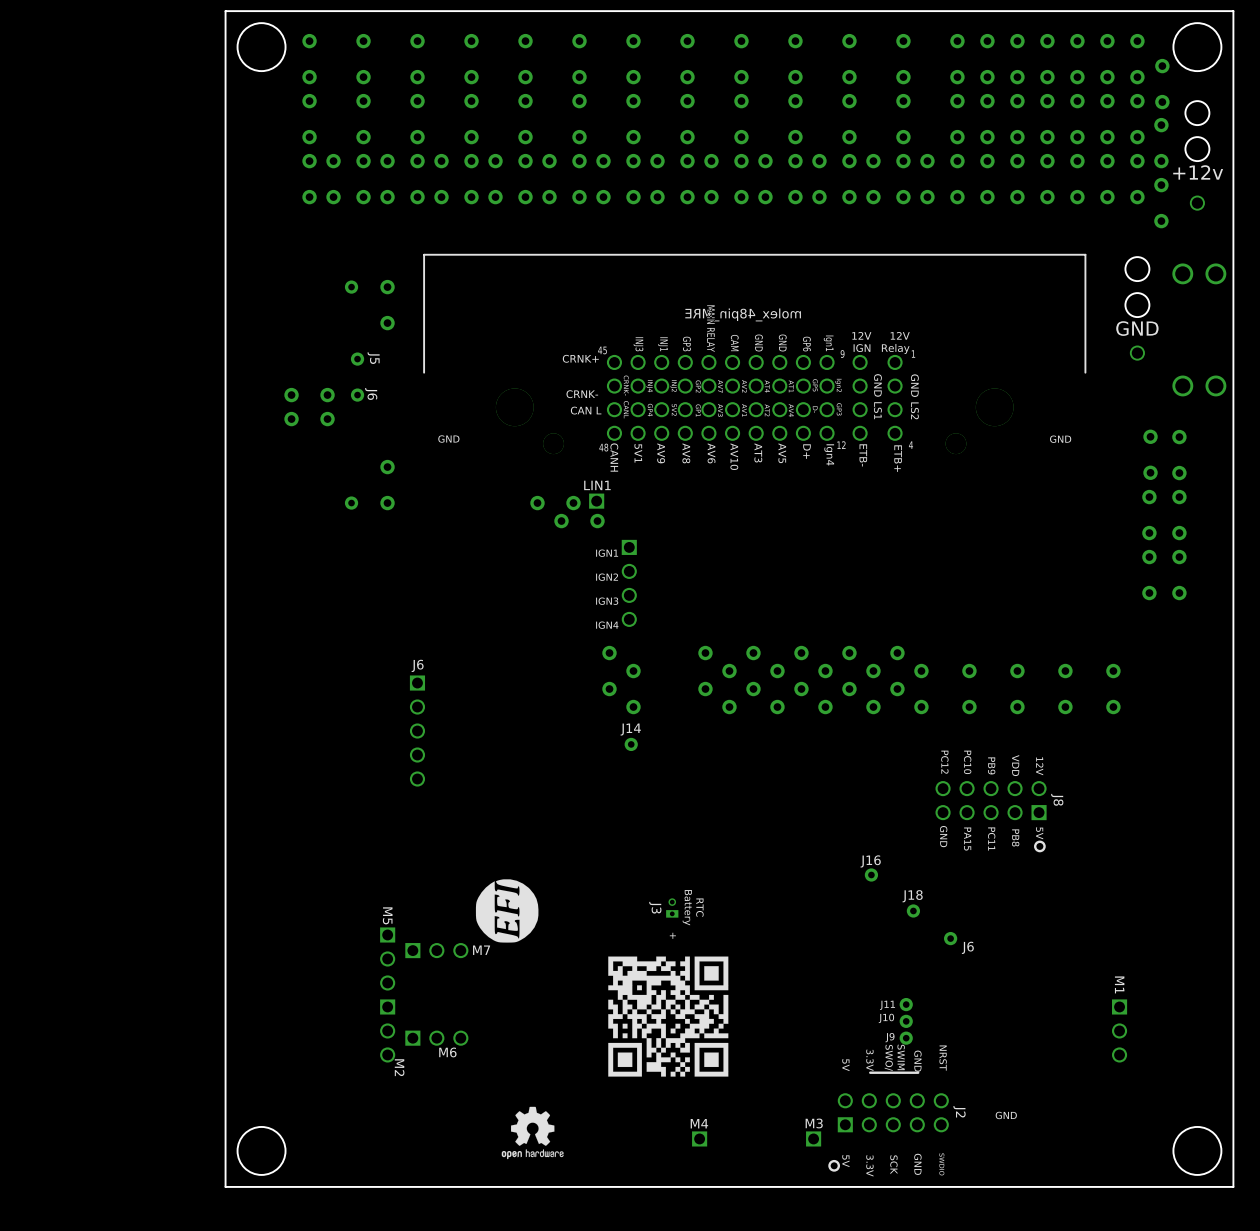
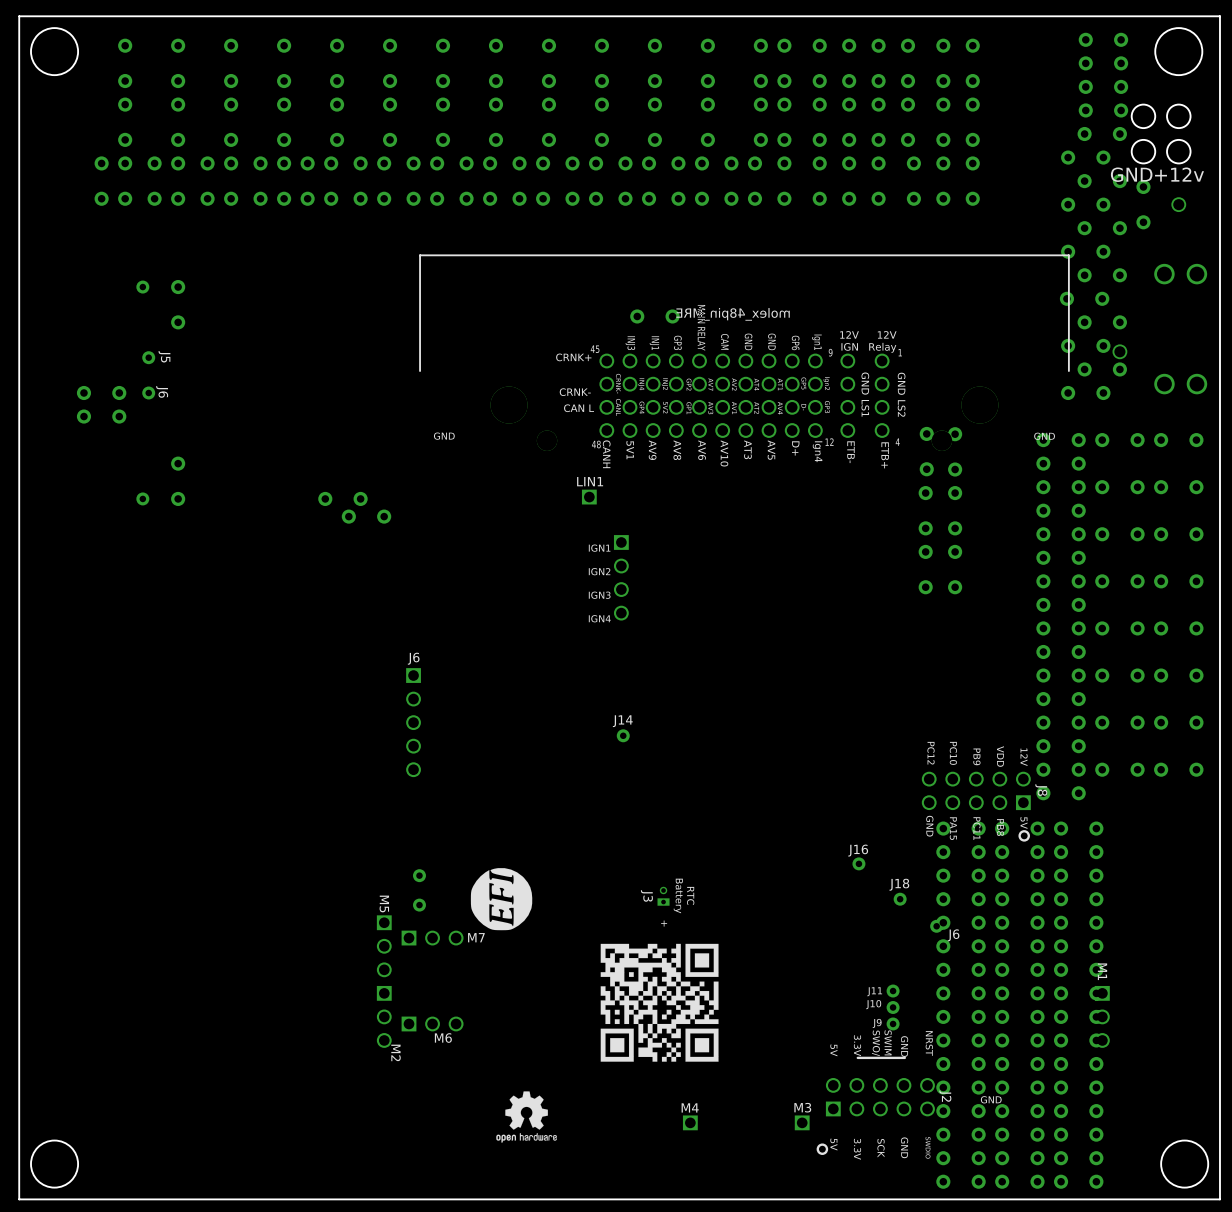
board edge: (1233, 11) (1233, 1186) (225, 1186) (225, 11) -> (1214, 16) (1219, 16) (1219, 1199) (19, 1199) (19, 16) (225, 16)
part: none -> (1103, 39)
round board edge position: (261, 47) -> (54, 51)
part: none -> (125, 63)
part: none -> (178, 63)
part: none -> (231, 63)
part: none -> (284, 63)
part: (309, 59) -> none
part: none -> (337, 63)
part: (363, 59) -> none
part: none -> (390, 63)
part: (417, 59) -> none
part: none -> (443, 63)
part: (471, 59) -> none
part: none -> (496, 63)
part: (525, 59) -> none
part: none -> (548, 63)
part: (579, 59) -> none
part: none -> (601, 63)
part: (633, 59) -> none
part: none -> (654, 63)
part: (687, 59) -> none
part: none -> (707, 63)
part: (741, 59) -> none
part: none -> (760, 63)
part: none -> (819, 63)
part: (849, 59) -> none
part: none -> (849, 63)
part: none -> (878, 63)
part: (903, 59) -> none
part: none -> (908, 63)
part: (1017, 59) -> none
part: (1047, 59) -> none
part: (1077, 59) -> none
part: (1107, 59) -> none
part: none -> (1103, 63)
part: (1137, 59) -> none
part: none -> (1103, 86)
part: (1162, 84) -> none
round board edge: none -> [1130, 103, 1157, 130]
part: none -> (1103, 110)
part: none -> (125, 122)
part: none -> (178, 122)
part: none -> (231, 122)
part: none -> (284, 122)
part: (309, 119) -> none
part: none -> (337, 122)
part: (363, 119) -> none
part: none -> (390, 122)
part: (417, 119) -> none
part: none -> (443, 122)
part: (471, 119) -> none
part: none -> (496, 122)
part: (525, 119) -> none
part: none -> (548, 122)
part: (579, 119) -> none
part: none -> (601, 122)
part: (633, 119) -> none
part: none -> (654, 122)
part: (687, 119) -> none
part: none -> (707, 122)
part: (741, 119) -> none
part: none -> (760, 122)
part: none -> (819, 122)
part: (849, 119) -> none
part: none -> (849, 122)
part: none -> (878, 122)
part: (903, 119) -> none
part: none -> (908, 122)
part: (1017, 119) -> none
part: (1047, 119) -> none
part: (1077, 119) -> none
part: (1107, 119) -> none
part: (1137, 119) -> none
part: none -> (1102, 134)
round board edge: none -> [1130, 138, 1157, 165]
part: (1161, 143) -> none
part: none -> (1085, 157)
part: none -> (101, 181)
part: none -> (125, 181)
part: none -> (154, 181)
part: none -> (178, 181)
part: none -> (207, 181)
part: none -> (231, 181)
part: none -> (260, 181)
part: none -> (284, 181)
part: (819, 179) -> none
part: none -> (819, 181)
part: (849, 179) -> none
part: none -> (849, 181)
part: (873, 179) -> none
part: none -> (878, 181)
part: (903, 179) -> none
part: (1017, 179) -> none
part: (1047, 179) -> none
part: (1077, 179) -> none
part: (1107, 179) -> none
part: none -> (1102, 181)
part: (1137, 179) -> none
part: none -> (1085, 204)
part: none -> (1102, 228)
part: none -> (1085, 251)
round board edge: [1124, 256, 1151, 283] -> none
part: none -> (1102, 275)
part: none -> (142, 287)
part: (351, 287) -> none
round board edge: [1124, 292, 1151, 319] -> none
part: none -> (1084, 298)
part: none -> (178, 304)
part: (387, 305) -> none
part: none -> (654, 316)
part: none -> (1102, 322)
text position: GND (1137, 328) -> GND (1131, 174)
part: none -> (1085, 345)
J5 position: (357, 359) -> (148, 357)
part: none -> (1102, 369)
part: none -> (101, 392)
part: (309, 395) -> none
J6 position: (357, 395) -> (148, 392)
part: none -> (1085, 392)
part: none -> (101, 416)
part: (309, 419) -> none
part: none -> (1061, 440)
part: none -> (1178, 440)
part: none -> (926, 451)
part rotation: 0° (1150, 454) -> 90° clockwise (1119, 440)
part: none -> (955, 451)
part: (1179, 455) -> none
part: none -> (1061, 463)
part: none -> (178, 481)
part rotation: 0° (387, 485) -> 90° clockwise (366, 516)
part position: (387, 485) -> (366, 516)
part: none -> (1061, 487)
part: none -> (1119, 487)
part: none -> (1178, 487)
part footprint: [344, 496, 359, 510] -> [318, 491, 368, 507]
part: none -> (142, 498)
part: (555, 503) -> none
part: none -> (925, 510)
part: none -> (955, 510)
part: none -> (1061, 510)
part: (1149, 515) -> none
part: (1179, 515) -> none
part: (579, 521) -> none
part: none -> (1061, 534)
part: none -> (1119, 534)
part: none -> (1178, 534)
part: none -> (1061, 557)
part: none -> (925, 569)
part: none -> (955, 569)
part rotation: 0° (1149, 575) -> 90° clockwise (1119, 581)
part: (1179, 575) -> none
part: none -> (1061, 581)
part: none -> (1178, 581)
part: none -> (1061, 604)
part: none -> (1061, 628)
part: none -> (1119, 628)
part: none -> (1178, 628)
part: none -> (1061, 651)
part: (609, 671) -> none
part: (705, 671) -> none
part: (753, 671) -> none
part: (801, 671) -> none
part: (849, 671) -> none
part: (897, 671) -> none
part: none -> (1061, 675)
part: none -> (1119, 675)
part: none -> (1178, 675)
part: (633, 689) -> none
part: (729, 689) -> none
part: (777, 689) -> none
part: (825, 689) -> none
part: (873, 689) -> none
part: (921, 689) -> none
part: (969, 689) -> none
part: (1017, 689) -> none
part: (1065, 689) -> none
part: (1113, 689) -> none
part: none -> (1061, 699)
part: none -> (1061, 722)
part: none -> (1119, 722)
part: none -> (1178, 722)
part: none -> (1061, 746)
part: none -> (1061, 769)
part: none -> (1119, 769)
part: none -> (1178, 769)
part: none -> (1061, 793)
part: none -> (961, 828)
part: none -> (1019, 828)
part: none -> (1078, 828)
part: none -> (961, 852)
part: none -> (1019, 852)
part: none -> (1078, 852)
part: none -> (419, 875)
part: none -> (961, 875)
part: none -> (1019, 875)
part: none -> (1078, 875)
part: none -> (961, 899)
part: none -> (1019, 899)
part: none -> (1078, 899)
part: none -> (419, 905)
part: none -> (961, 922)
part: none -> (1019, 922)
part: none -> (1078, 922)
part: none -> (961, 946)
part: none -> (1019, 946)
part: none -> (1078, 946)
part: none -> (961, 969)
part: none -> (1019, 969)
part: none -> (1078, 969)
part: none -> (961, 993)
part: none -> (1019, 993)
part: none -> (1078, 993)
part: none -> (961, 1016)
part: none -> (1019, 1016)
part: none -> (1078, 1016)
part: none -> (961, 1040)
part: none -> (1019, 1040)
part: none -> (1078, 1040)
part: none -> (961, 1064)
part: none -> (1019, 1064)
part: none -> (1078, 1064)
part: none -> (961, 1087)
part: none -> (1019, 1087)
part: none -> (1078, 1087)
part: none -> (961, 1111)
part: none -> (1019, 1111)
part: none -> (1078, 1111)
round board edge position: (261, 1150) -> (54, 1164)
part: none -> (961, 1134)
part: none -> (1019, 1134)
part: none -> (1078, 1134)
round board edge position: (1197, 1150) -> (1184, 1164)
part: none -> (961, 1158)
part: none -> (1019, 1158)
part: none -> (1078, 1158)
part: none -> (961, 1181)
part: none -> (1019, 1181)
part: none -> (1078, 1181)

